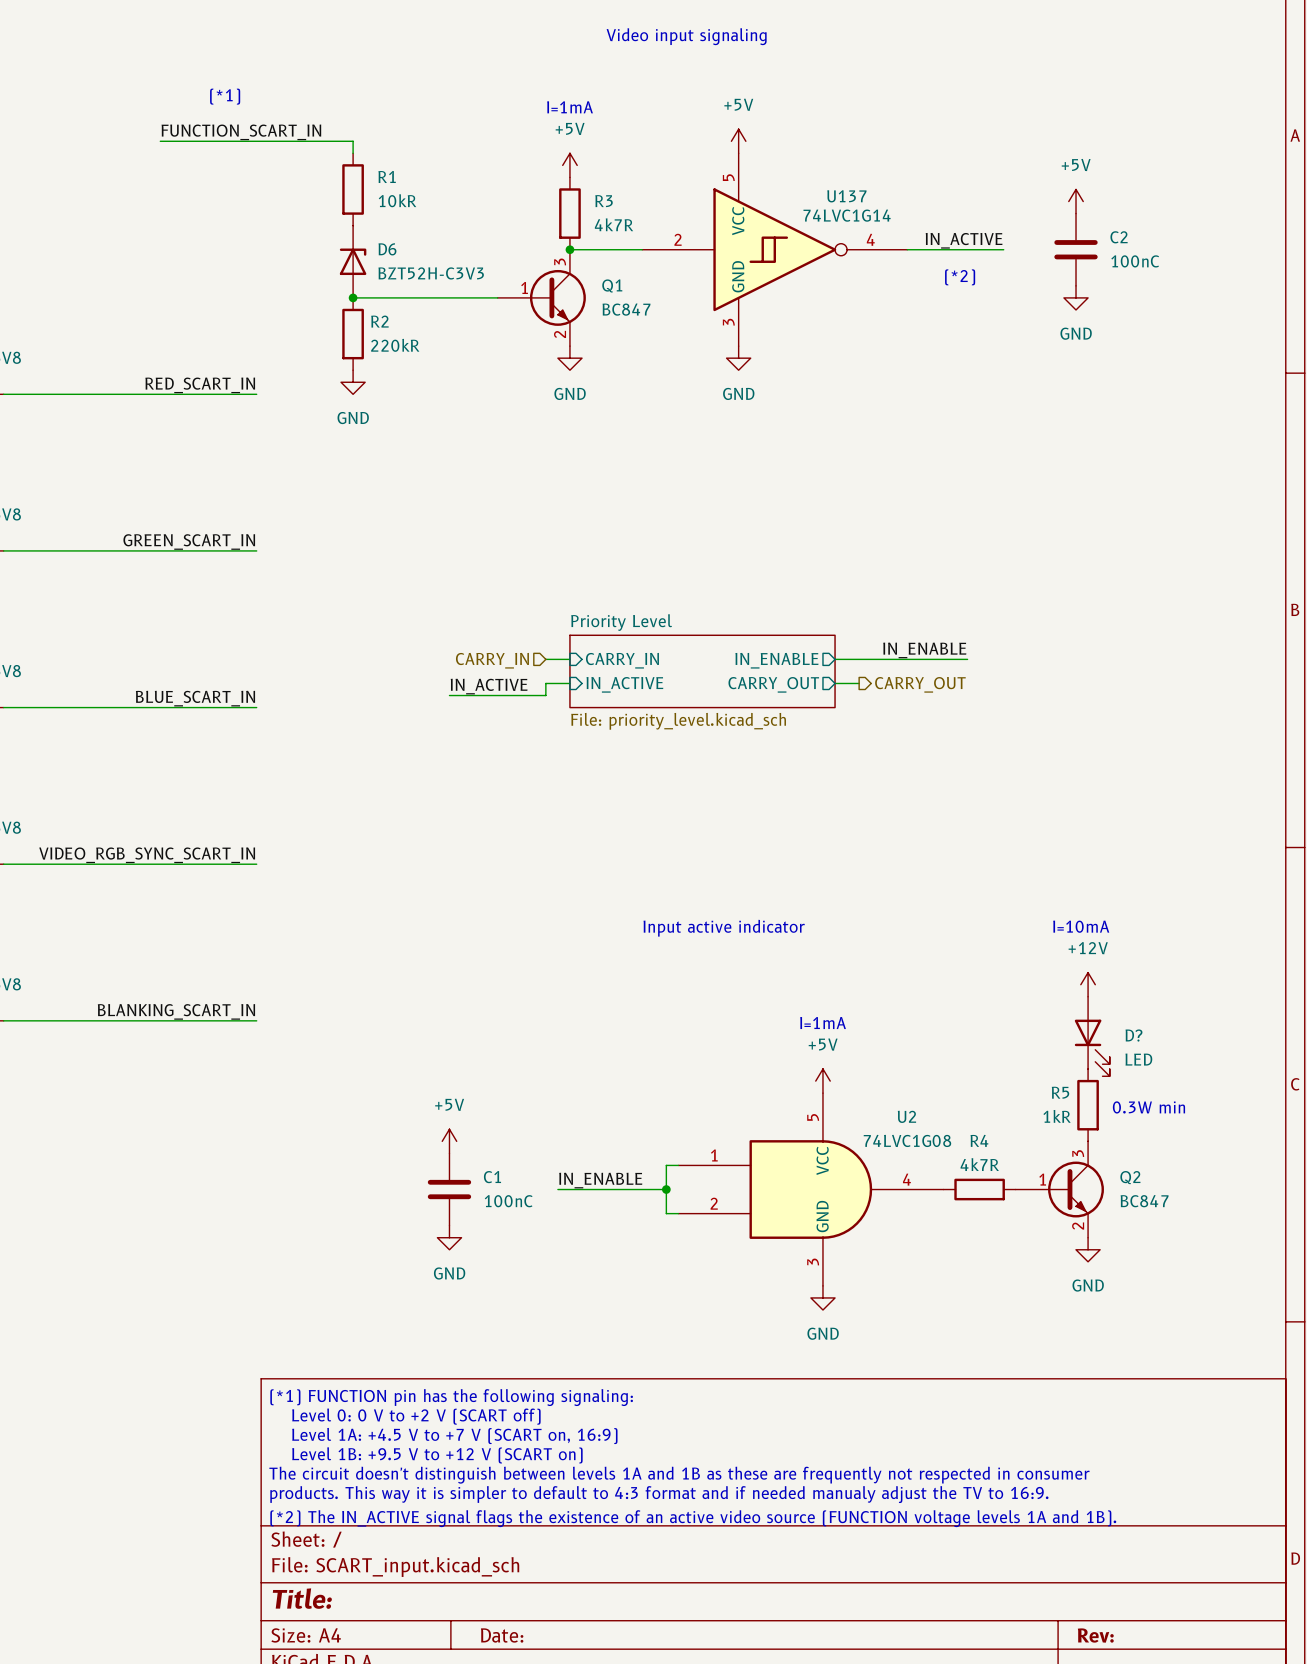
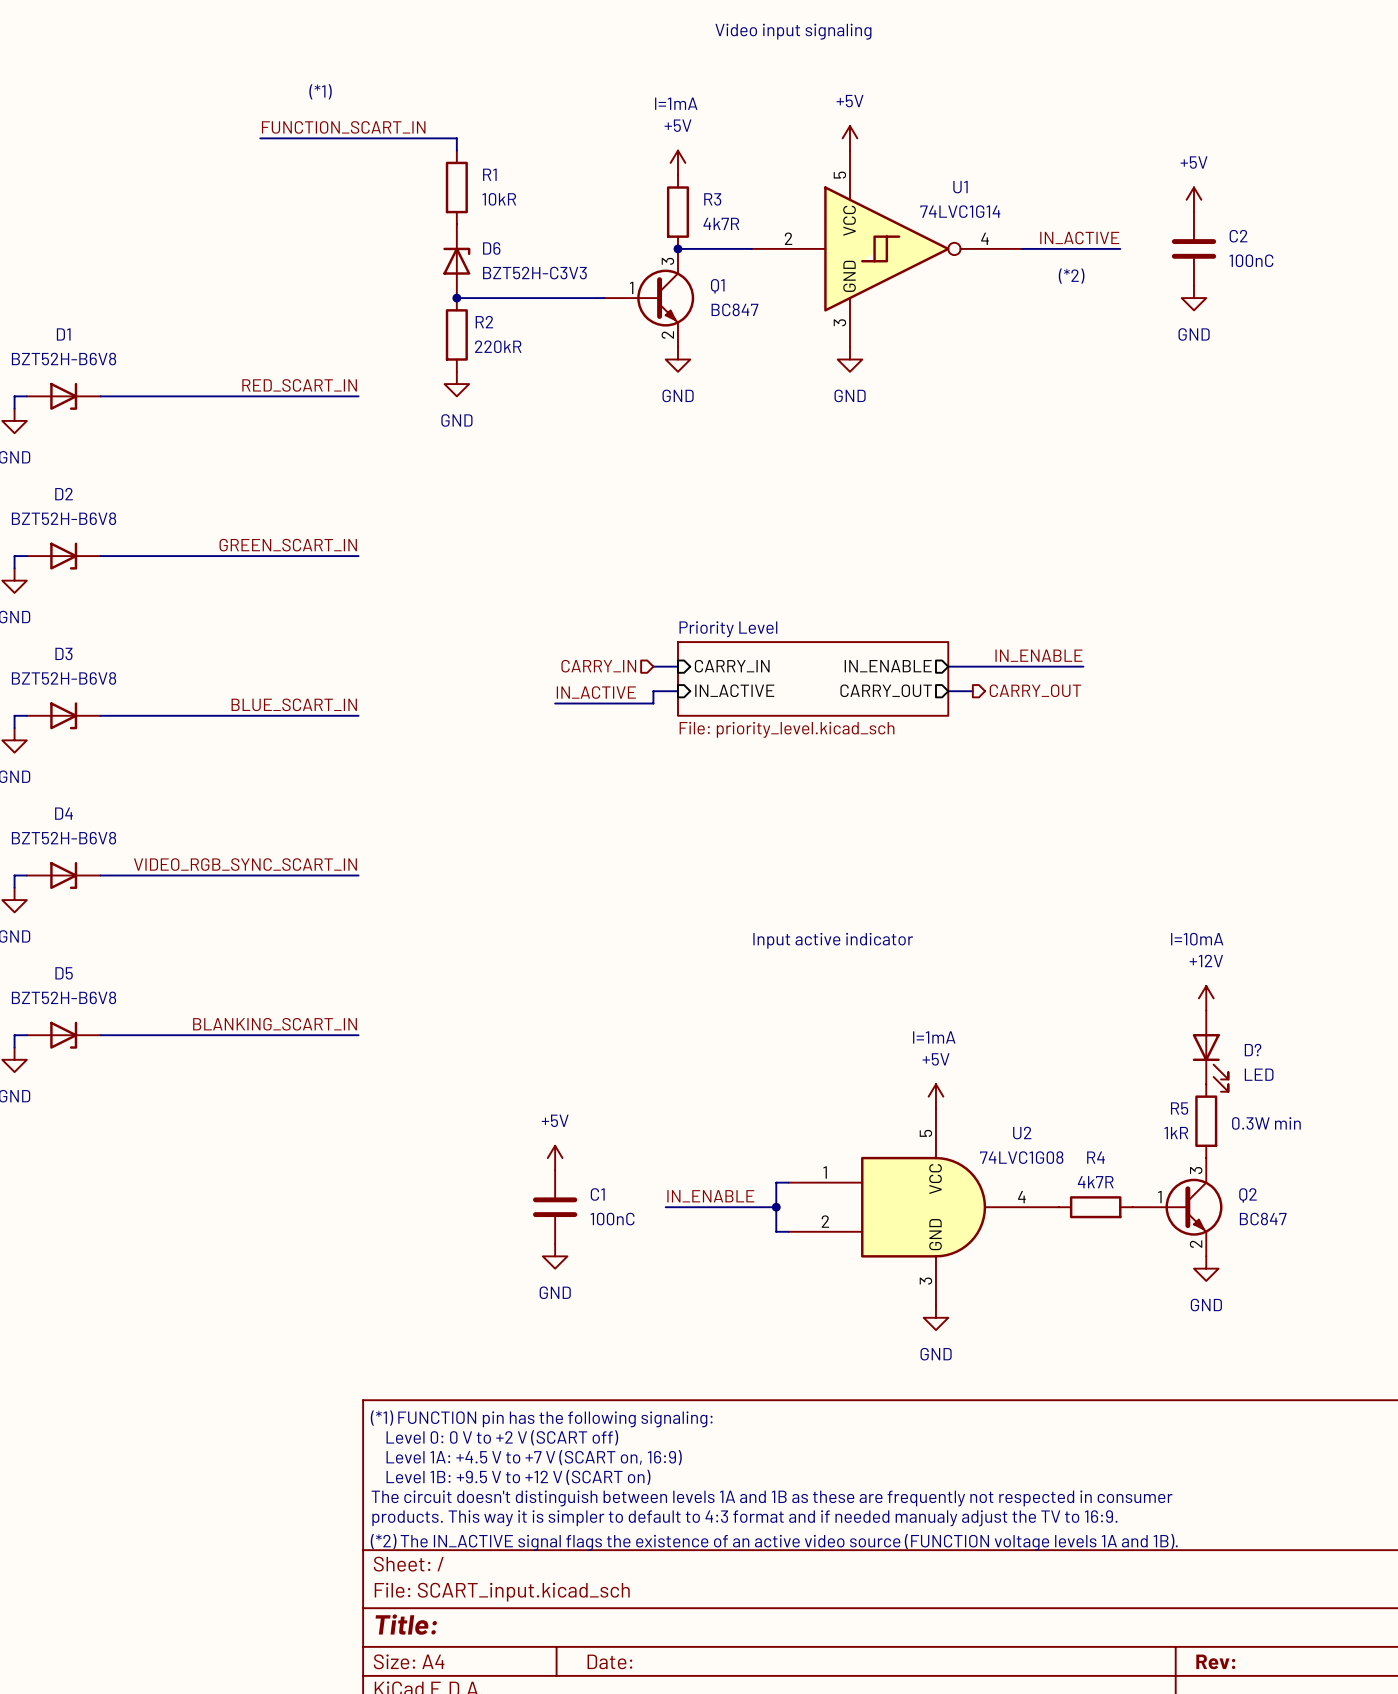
U137: 74LVC1G14 (774, 249) -> none
U1: none -> 74LVC1G14 (886, 248)

